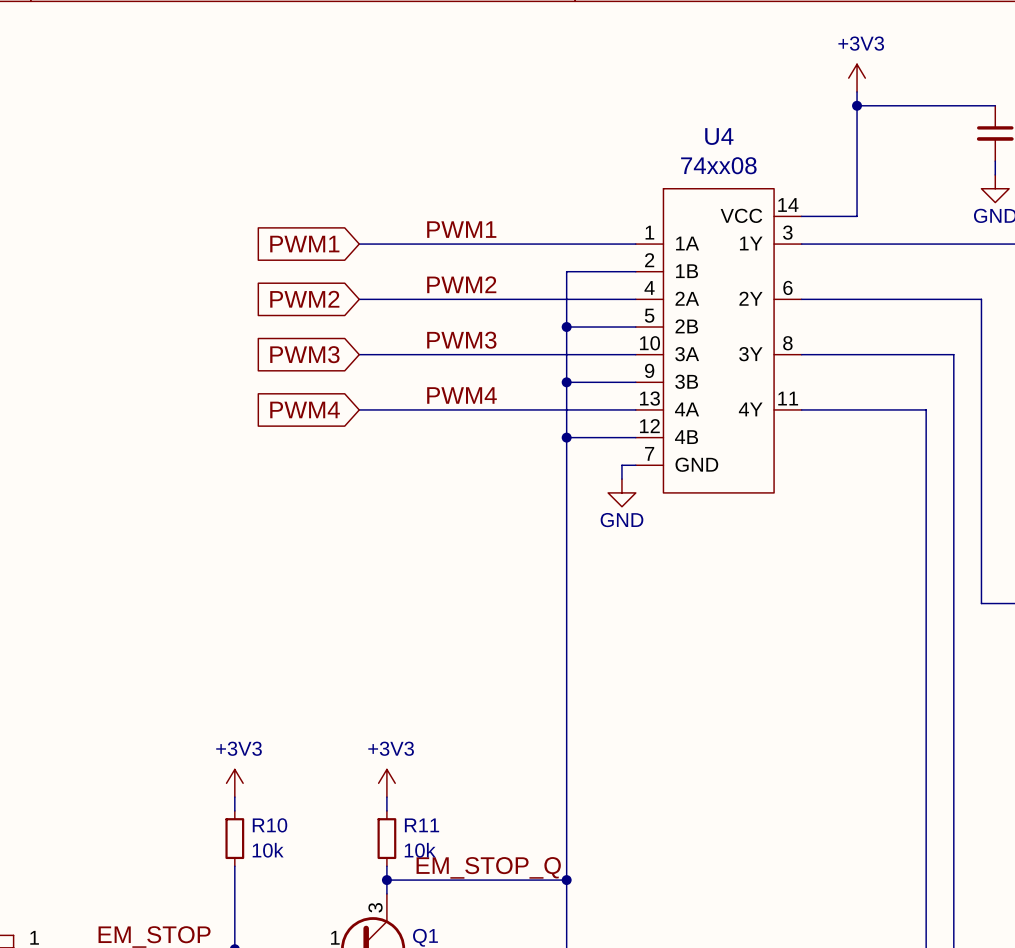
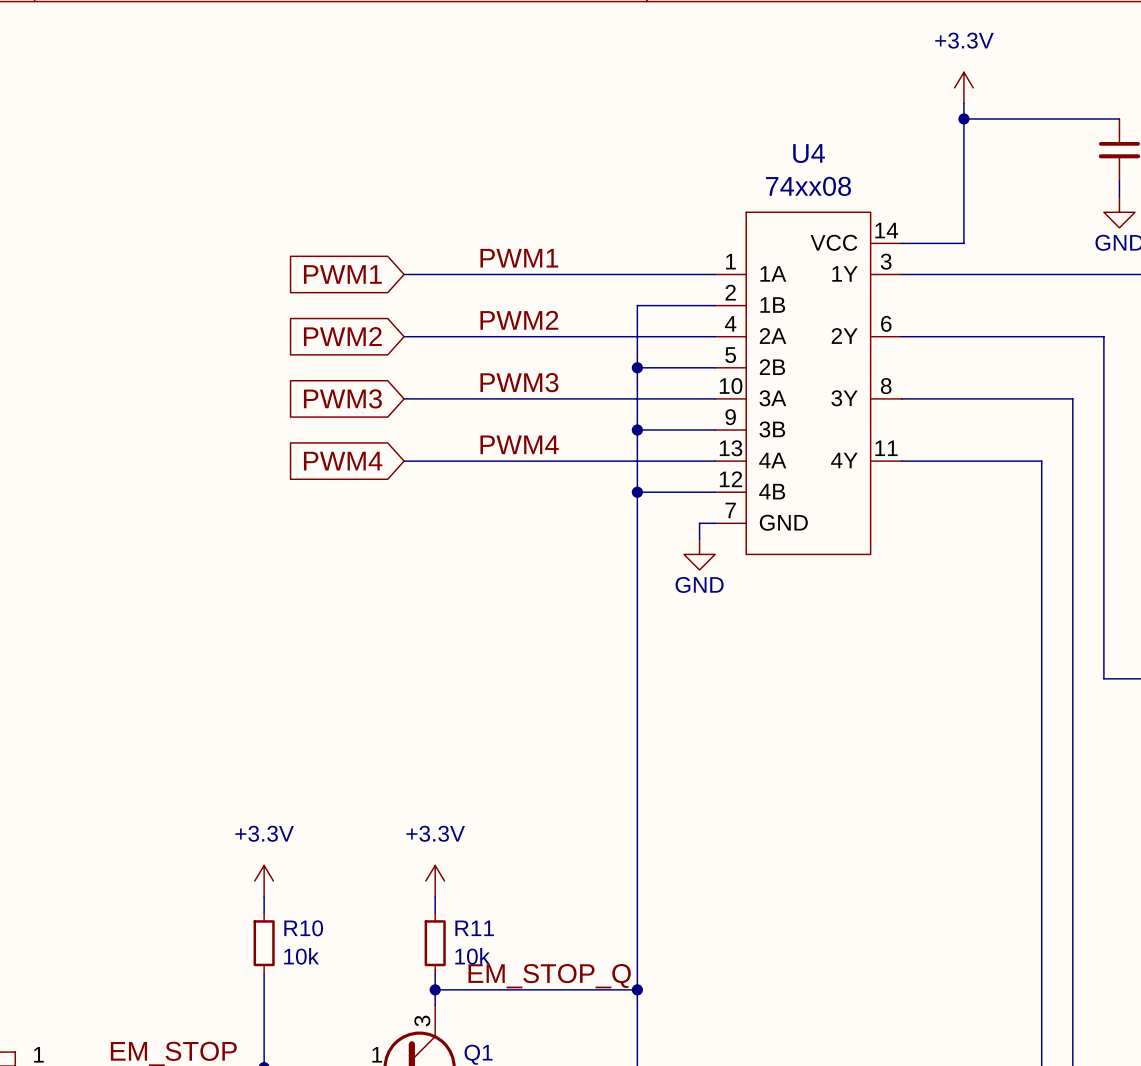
power symbol: +3V3 (857, 78) -> +3.3V (963, 87)
power symbol: +3V3 (234, 783) -> +3.3V (264, 881)
power symbol: +3V3 (386, 783) -> +3.3V (435, 881)

